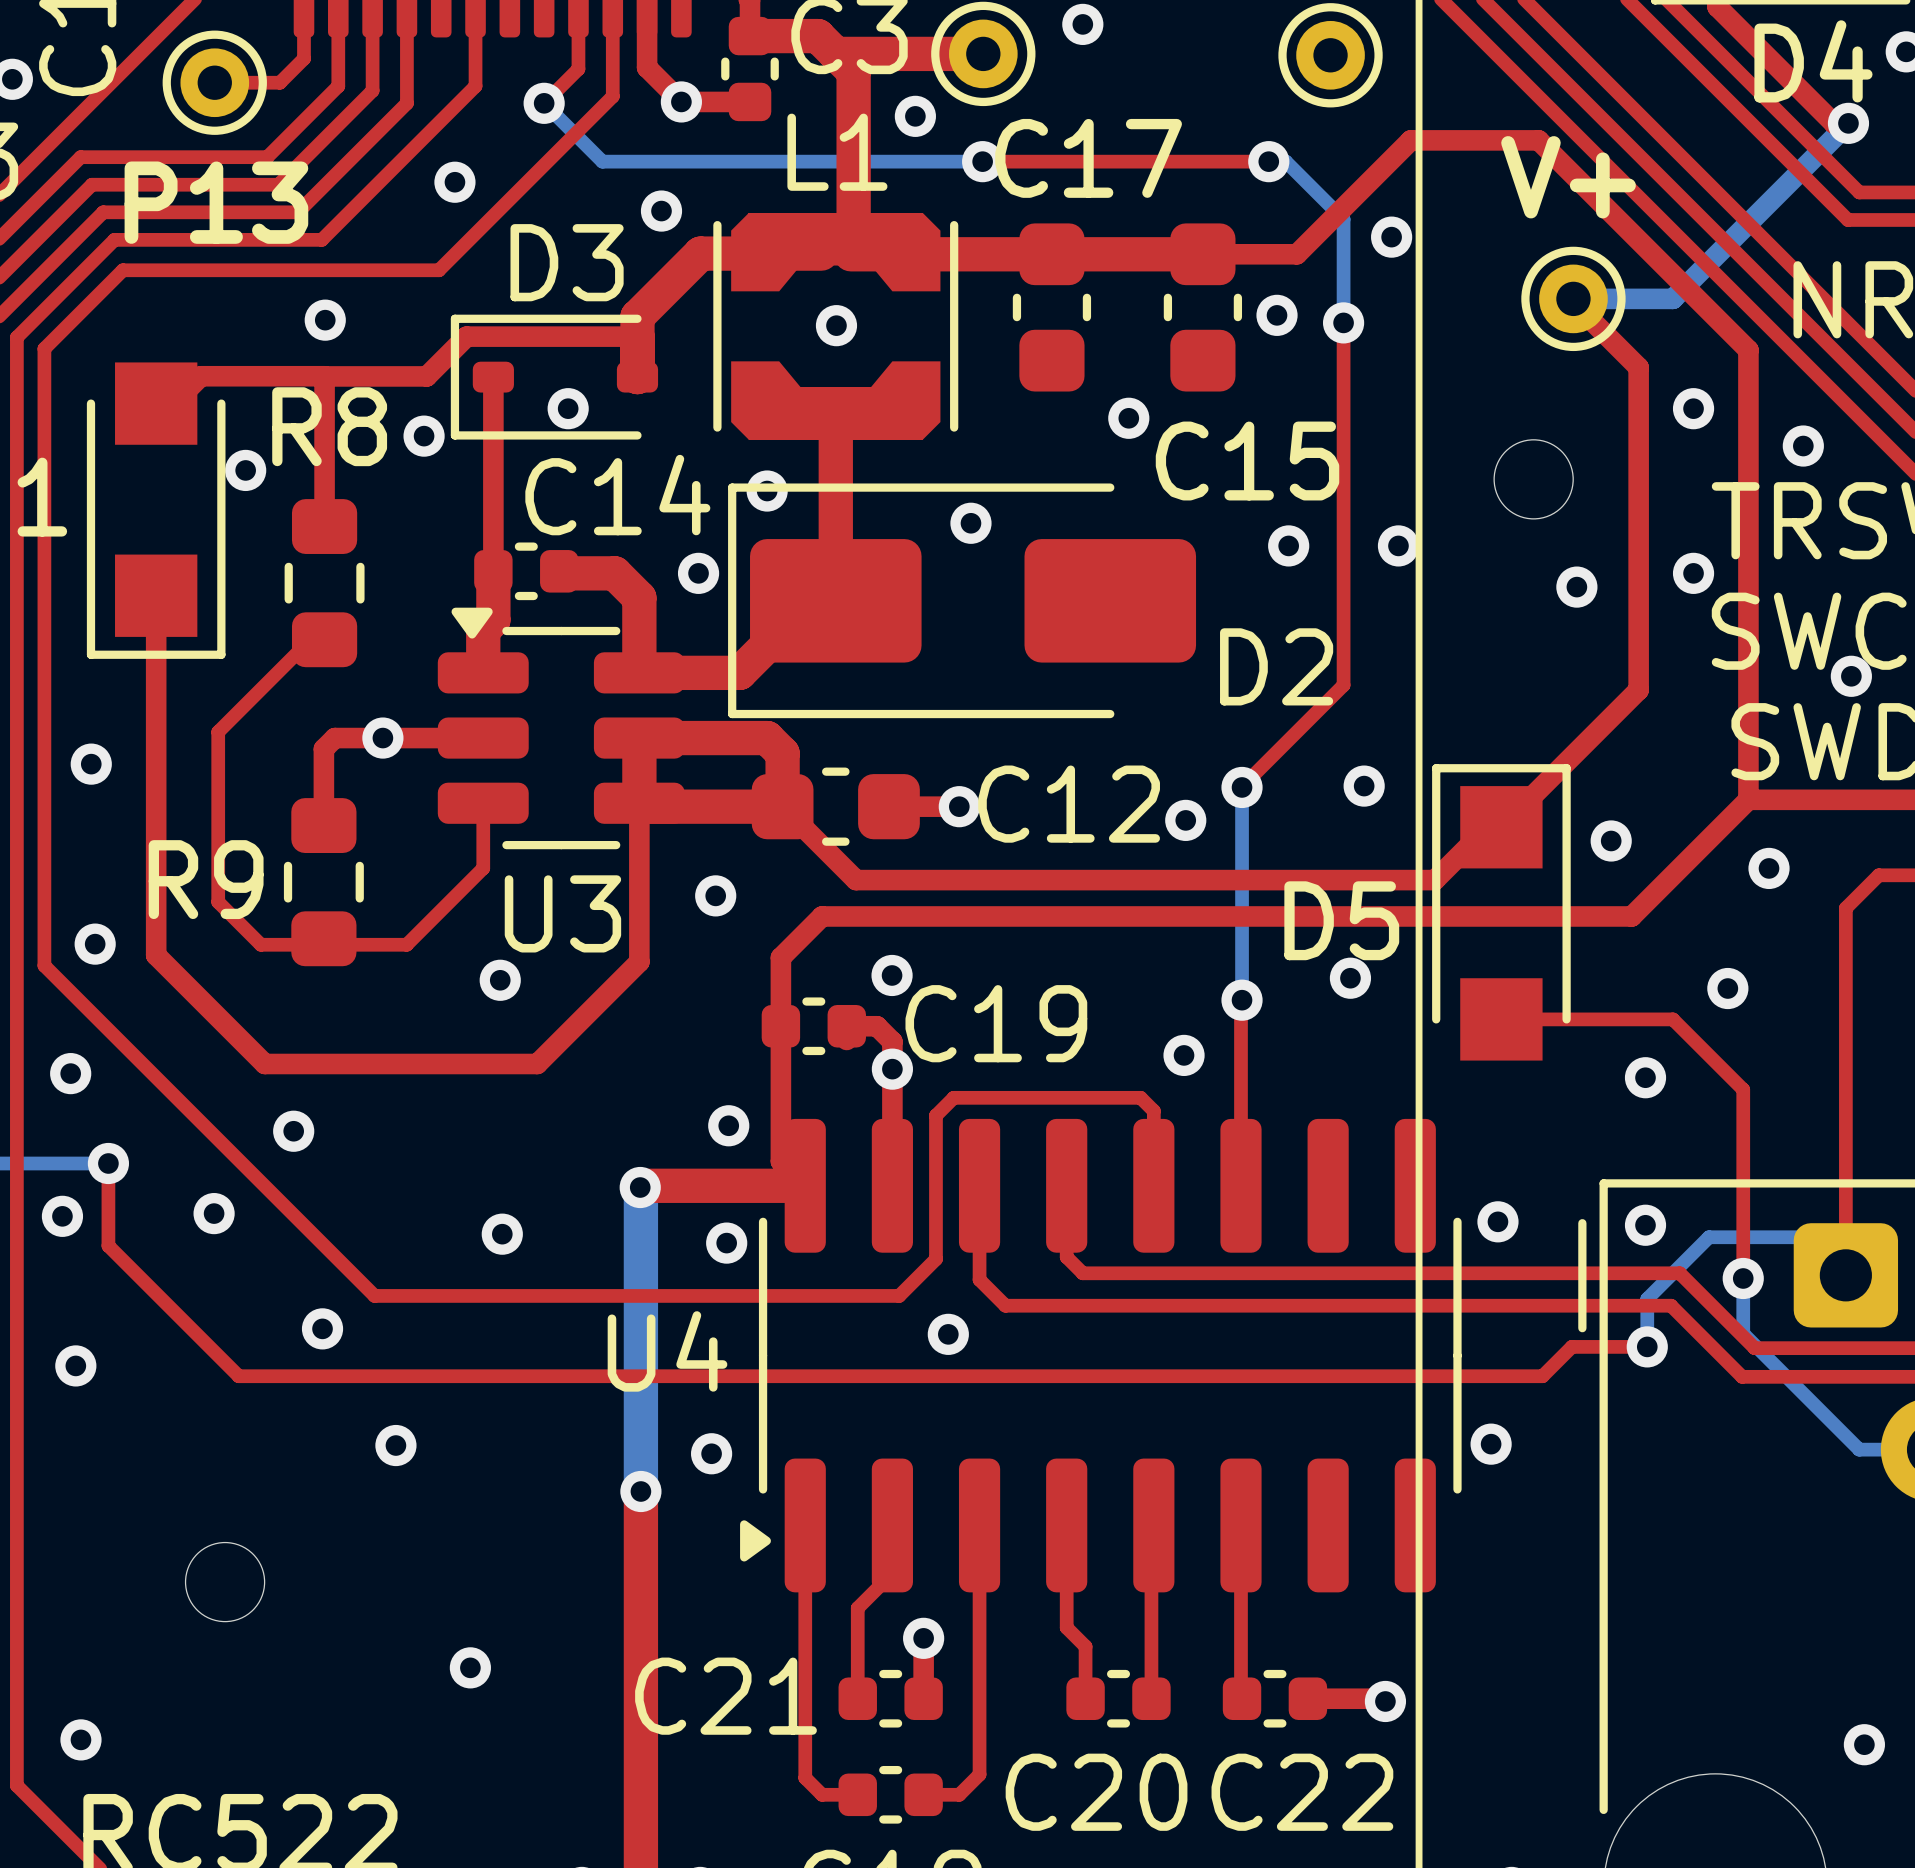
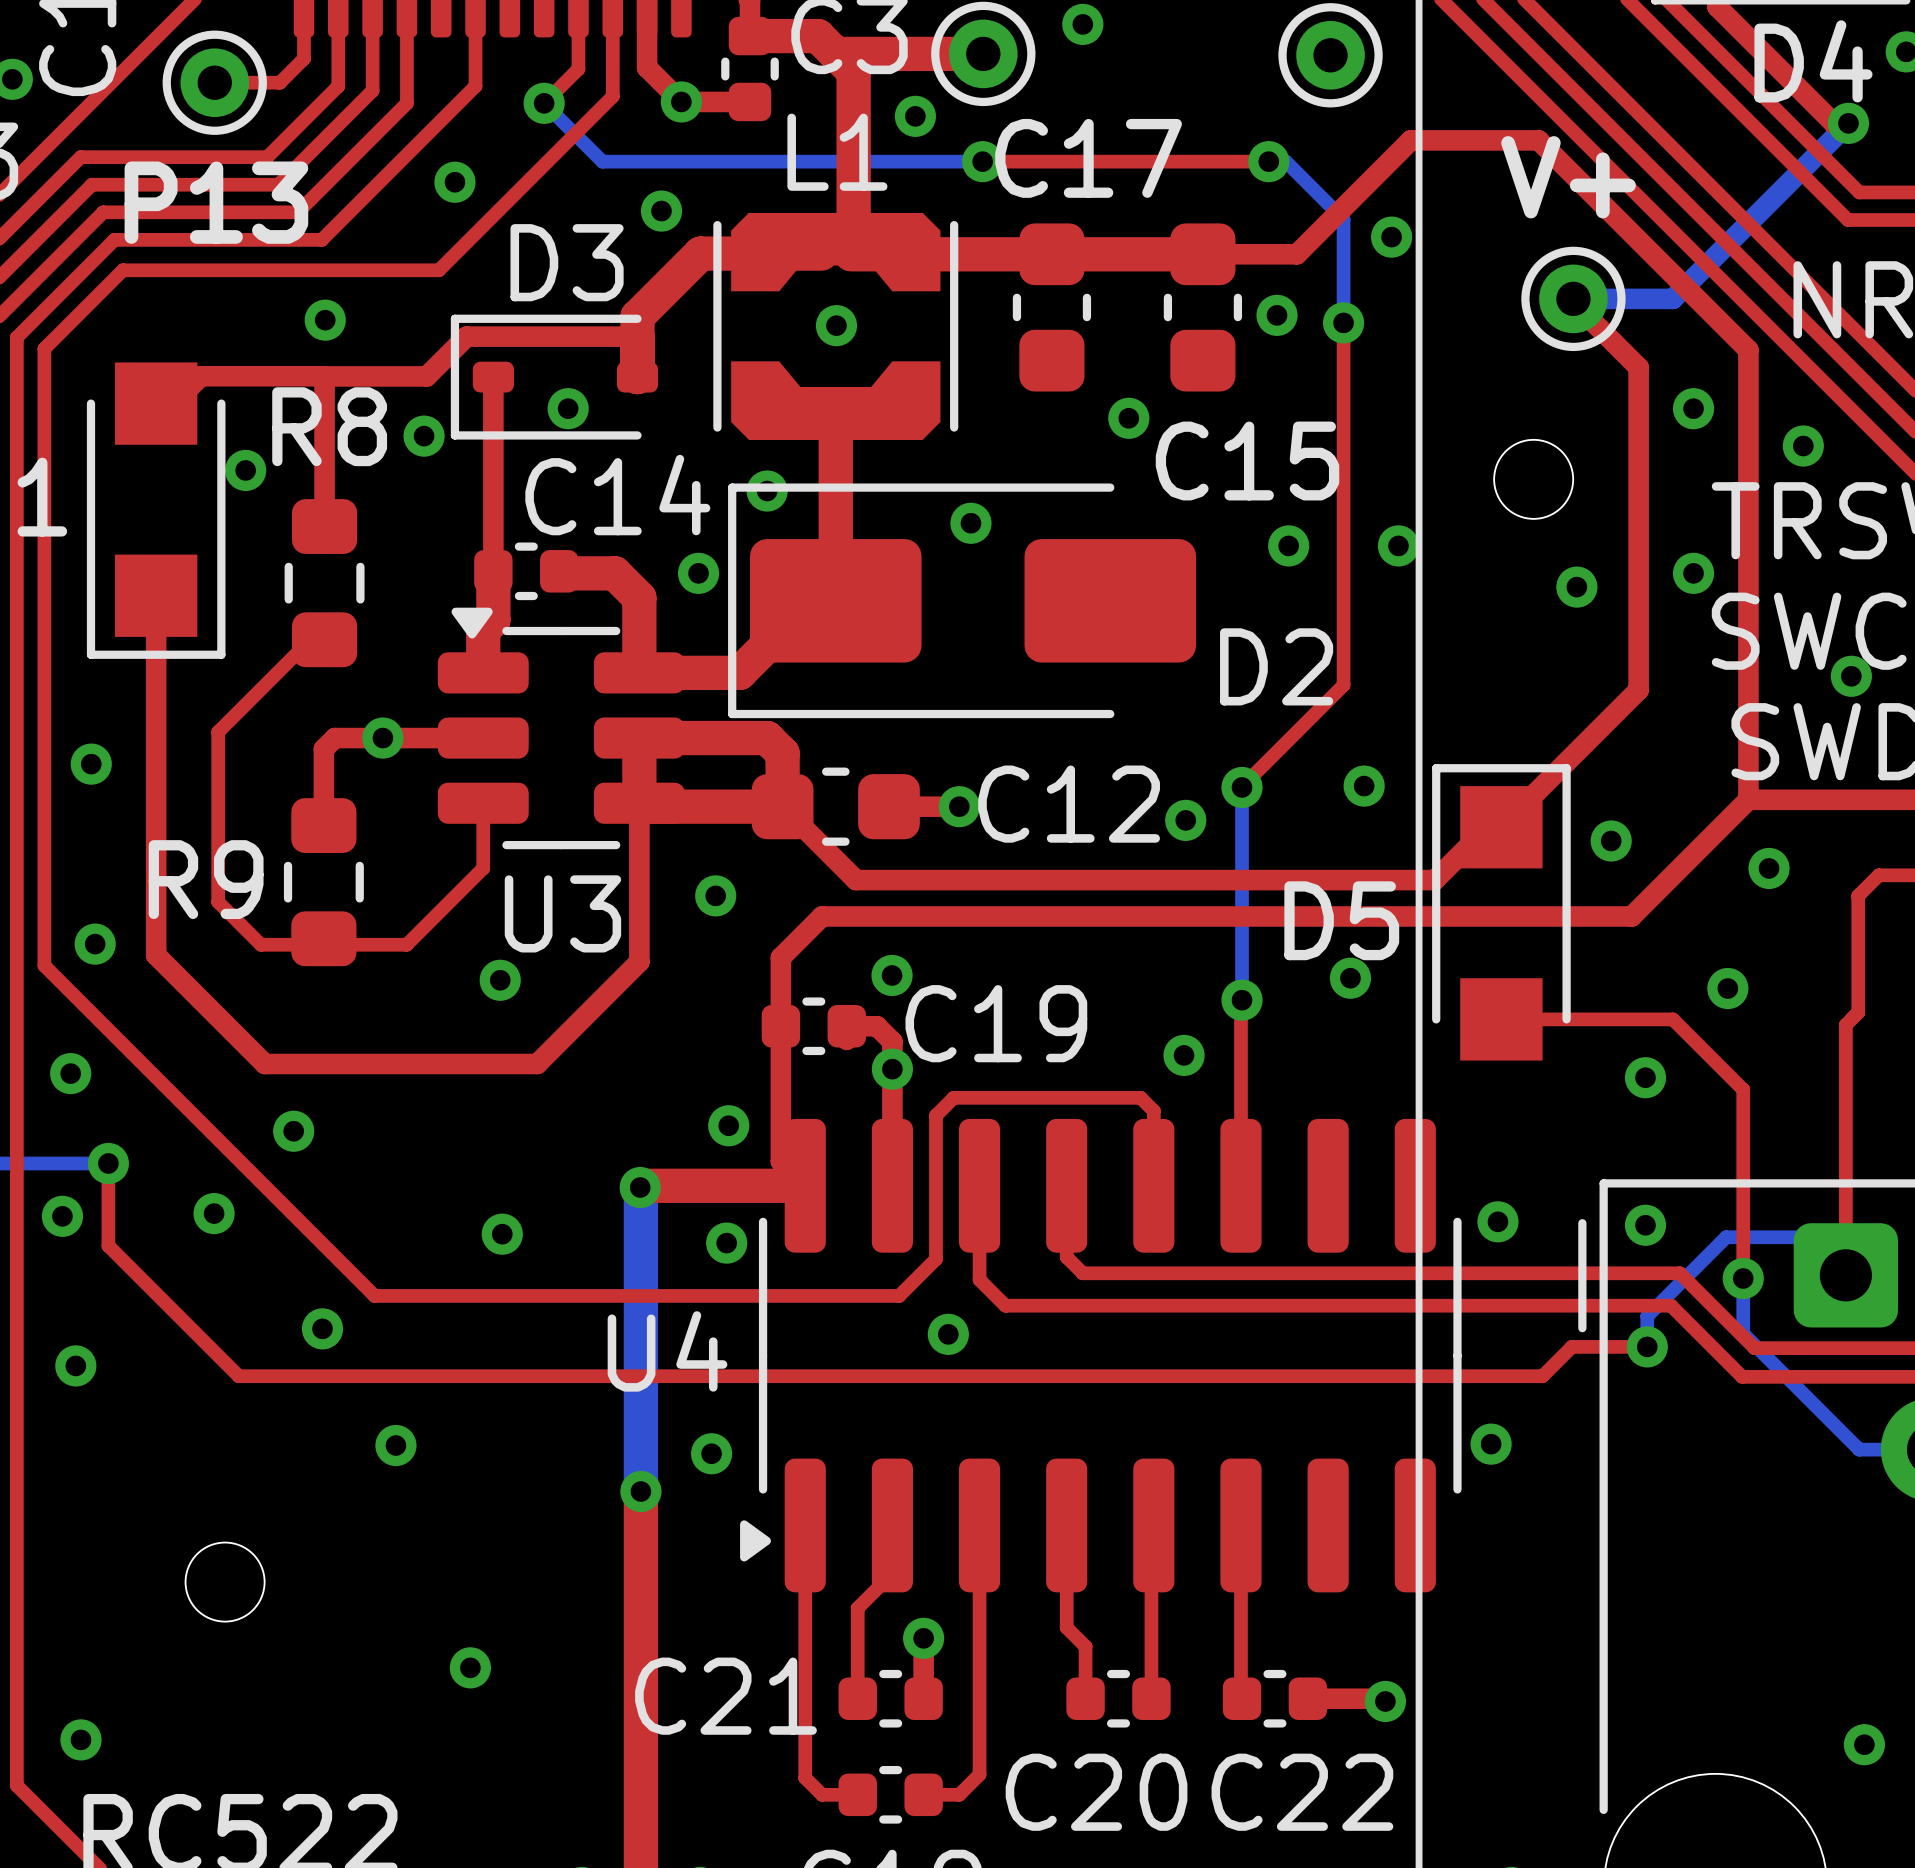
top track: (1858, 895) (1845, 908) (1845, 1024) -> (1858, 895) (1858, 1012) (1845, 1024)
bottom track: (1726, 1237) (1709, 1237) (1647, 1298) (1647, 1316) -> (1726, 1237) (1647, 1316)

